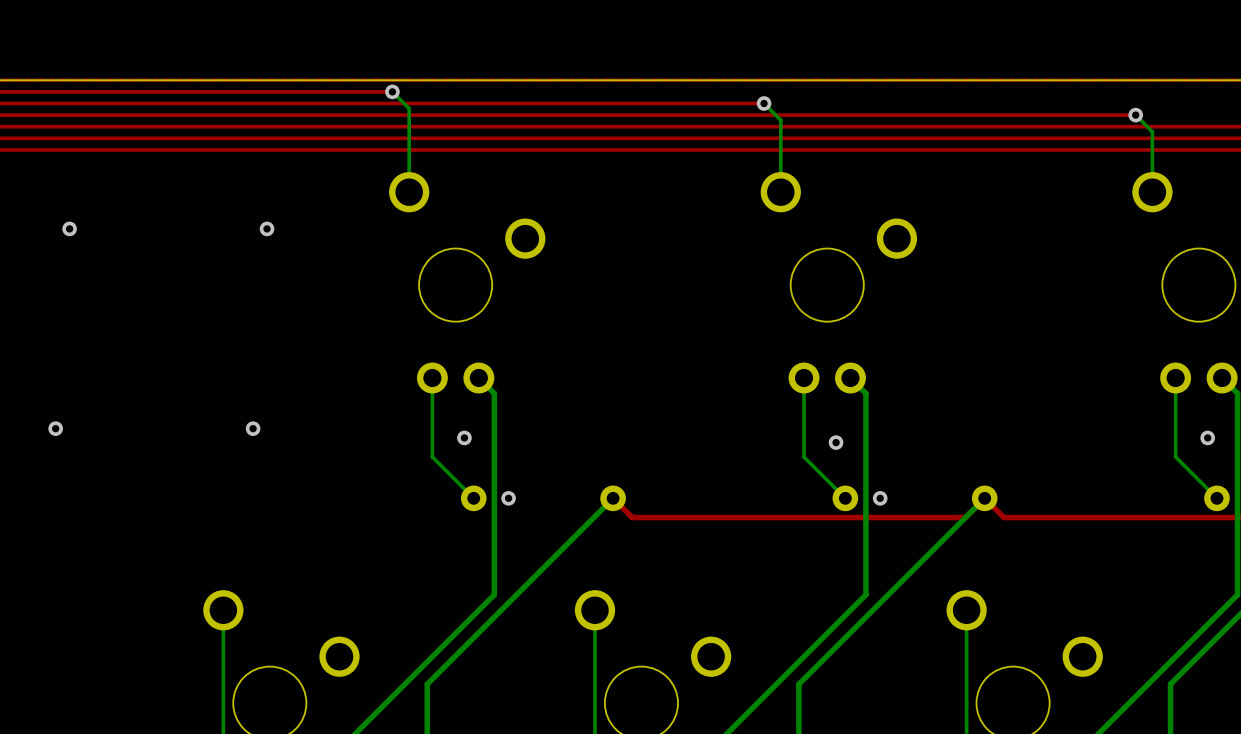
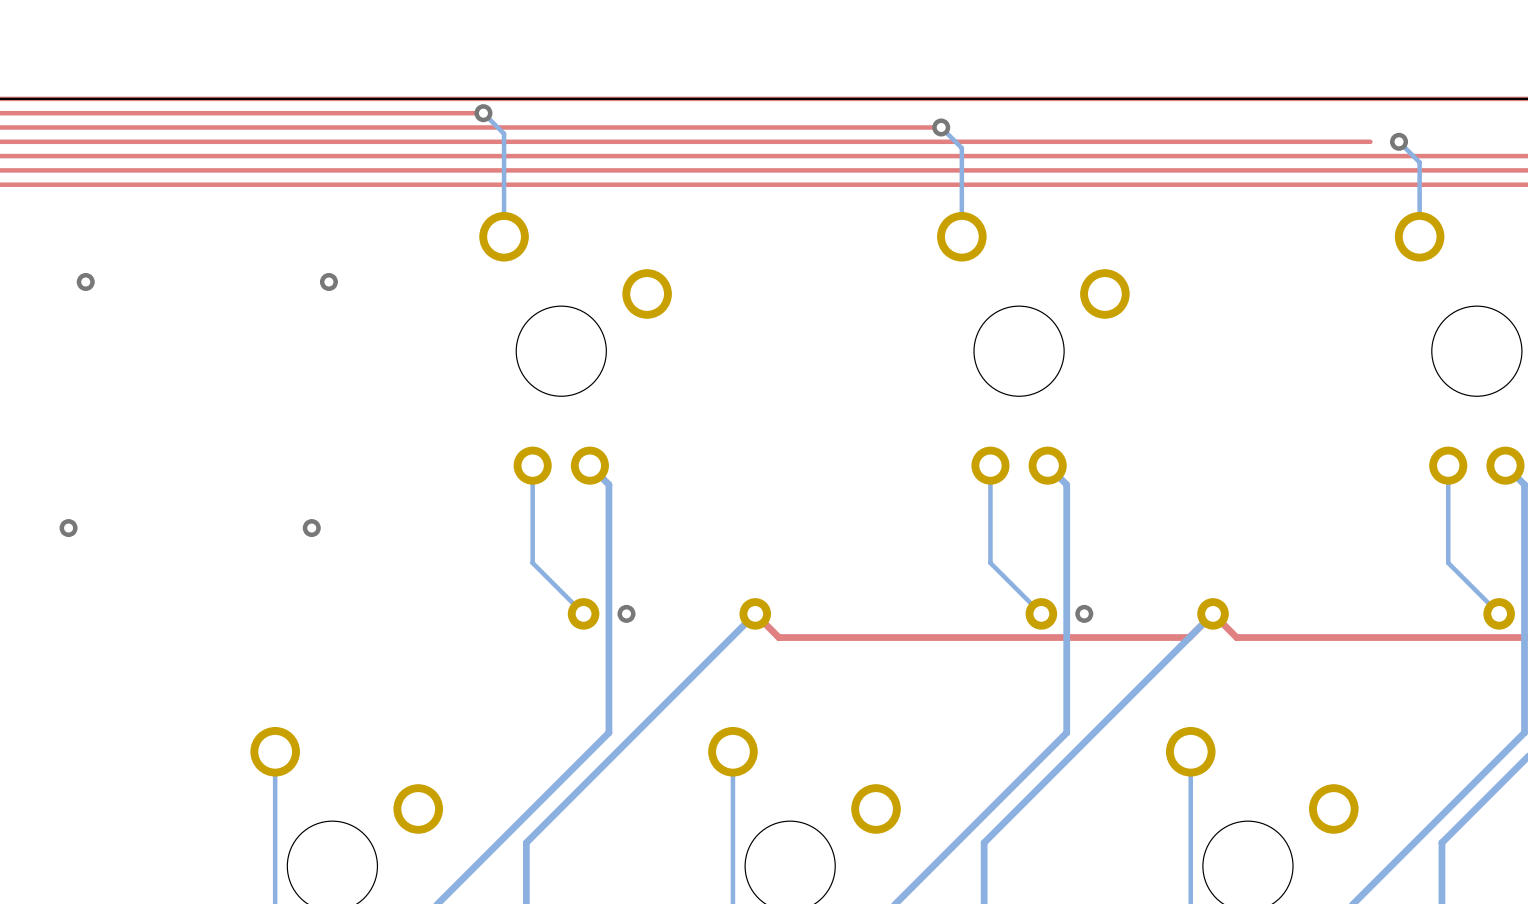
top track: (1135, 115) (1112, 115) -> none
via: (464, 437) -> none
via: (1207, 437) -> none
via: (836, 442) -> none

